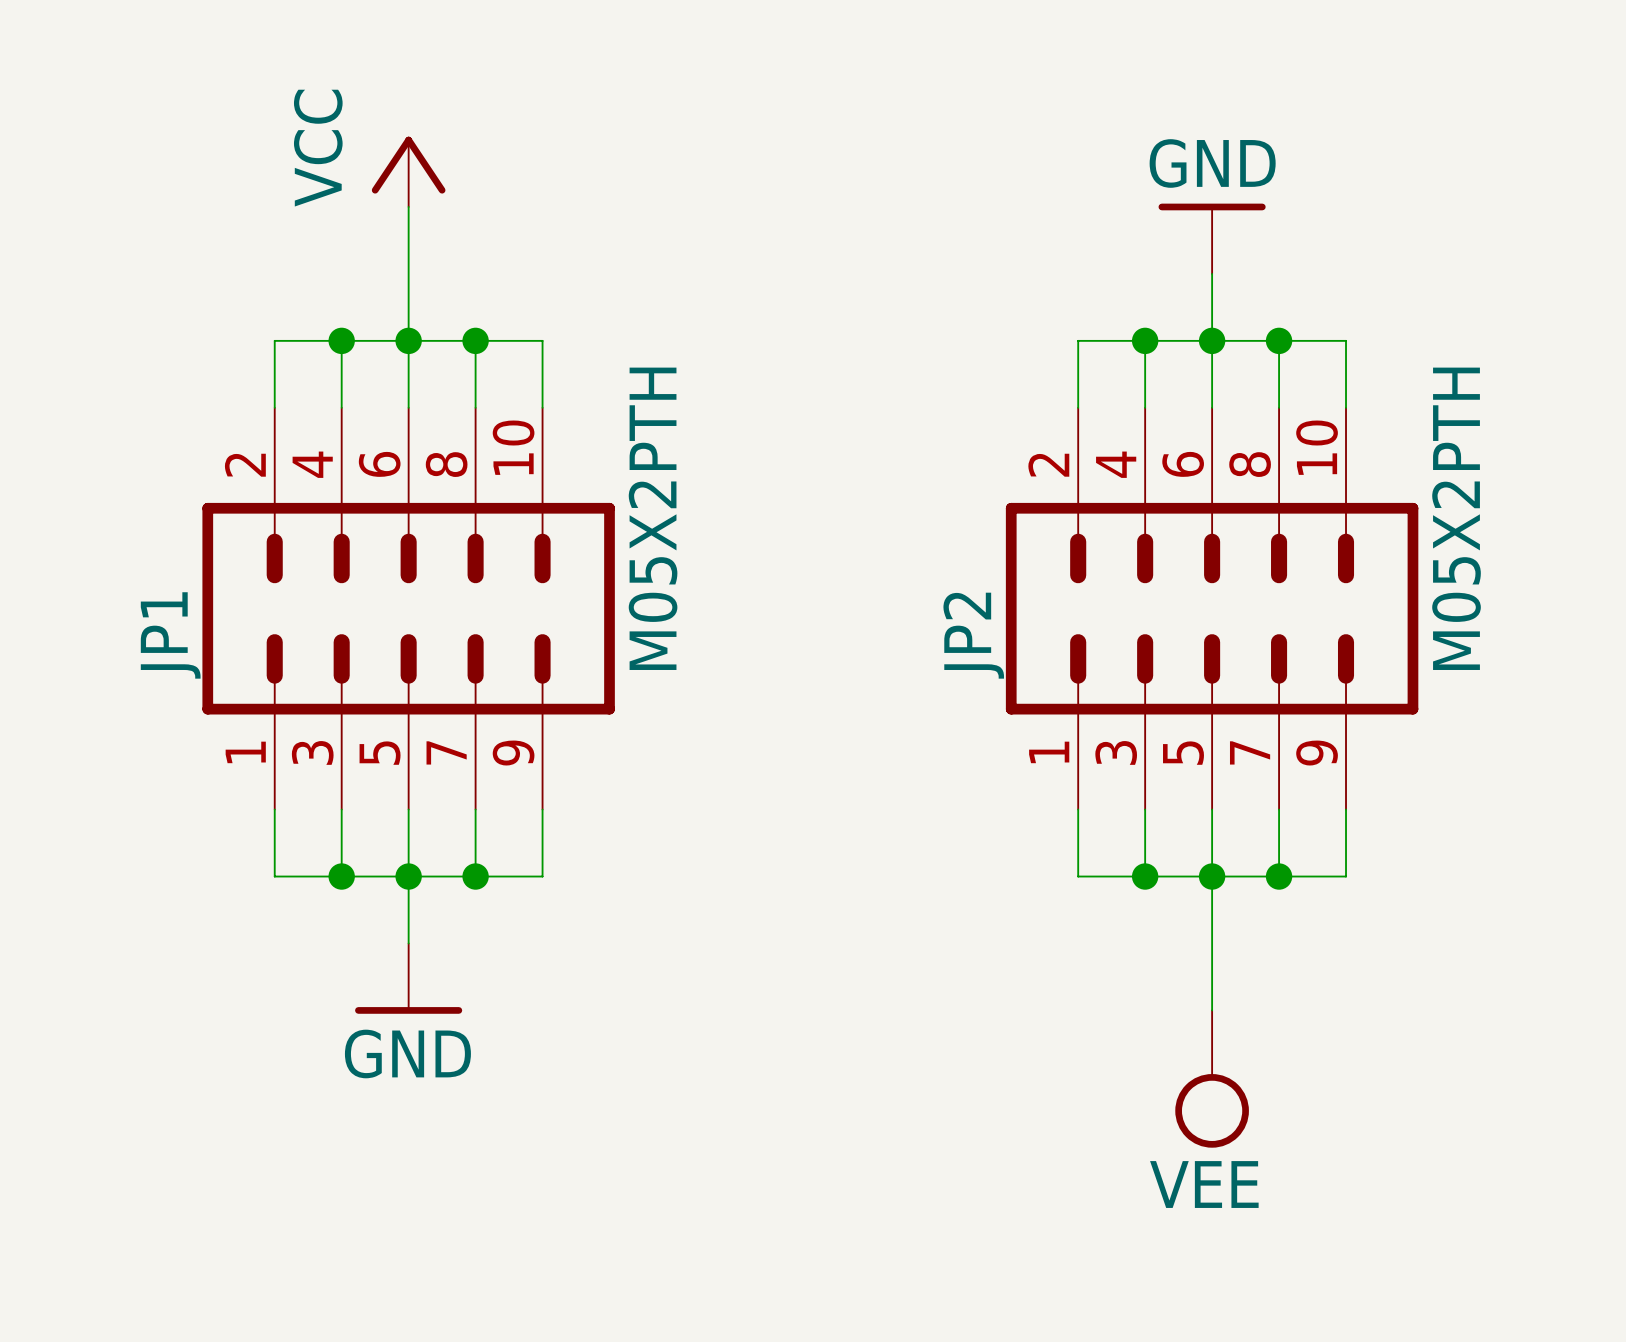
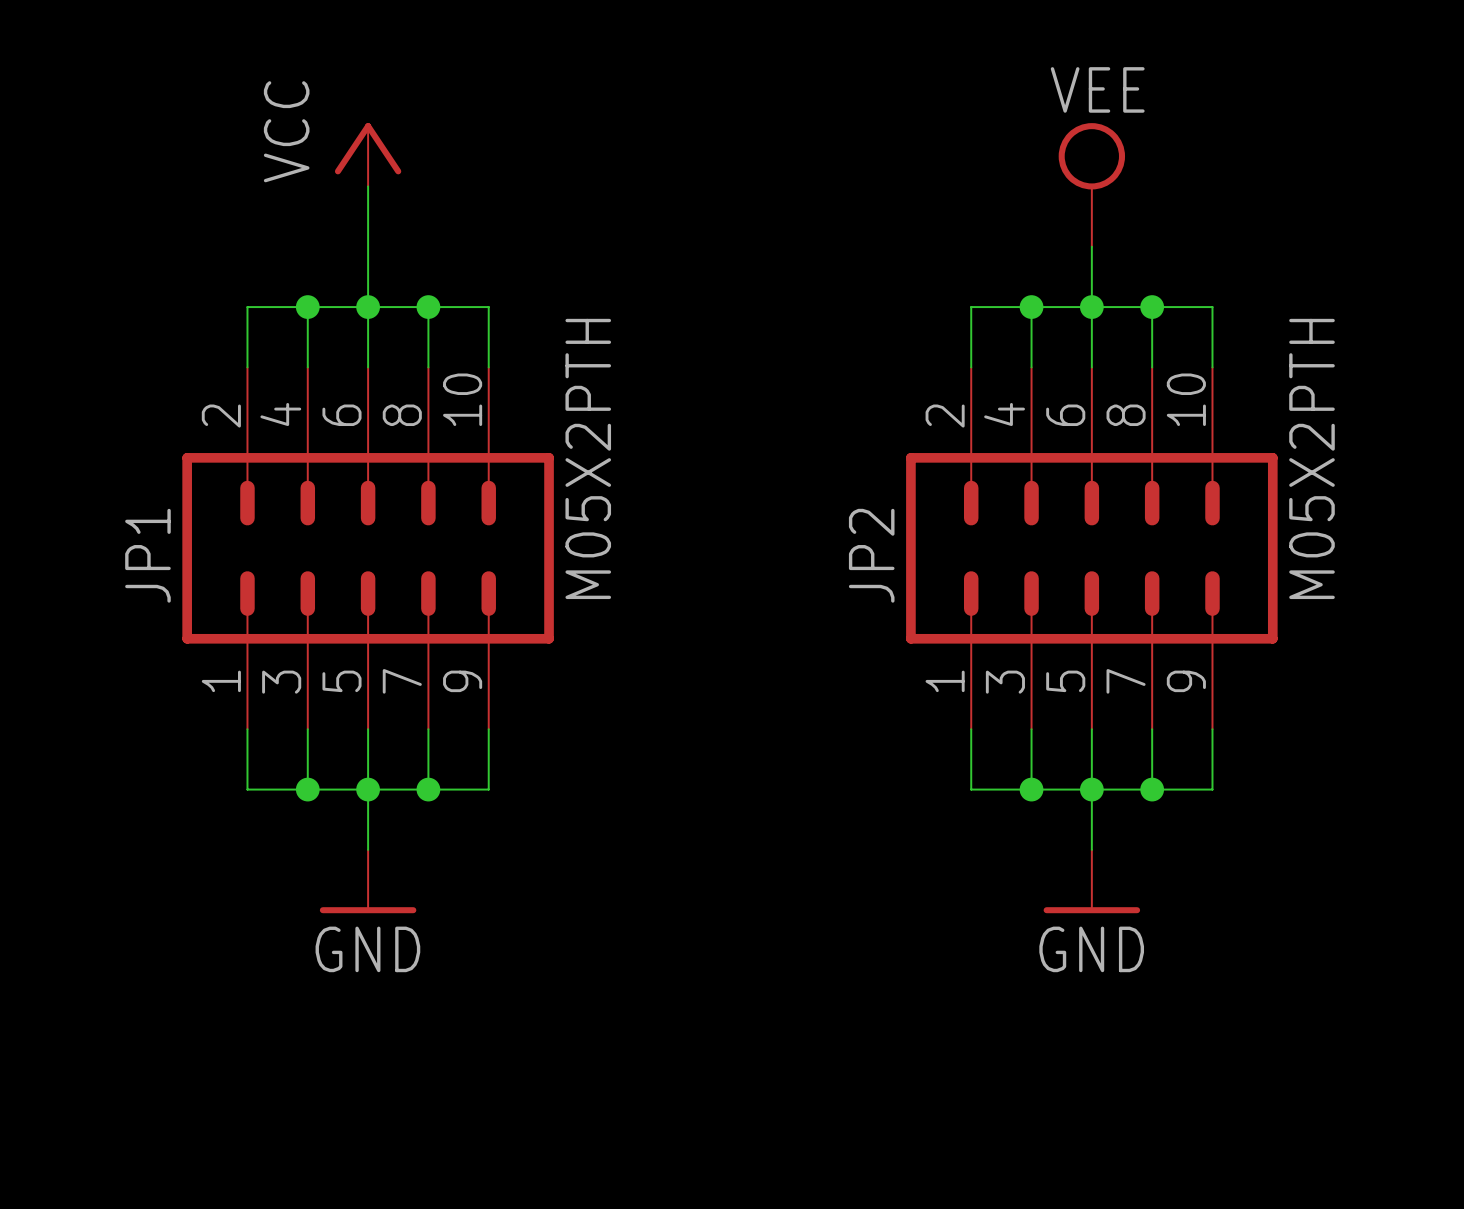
power symbol: none -> VEE (1091, 184)
power symbol: GND (1212, 238) -> none
power symbol: none -> GND (1091, 881)
power symbol: VEE (1212, 1079) -> none

